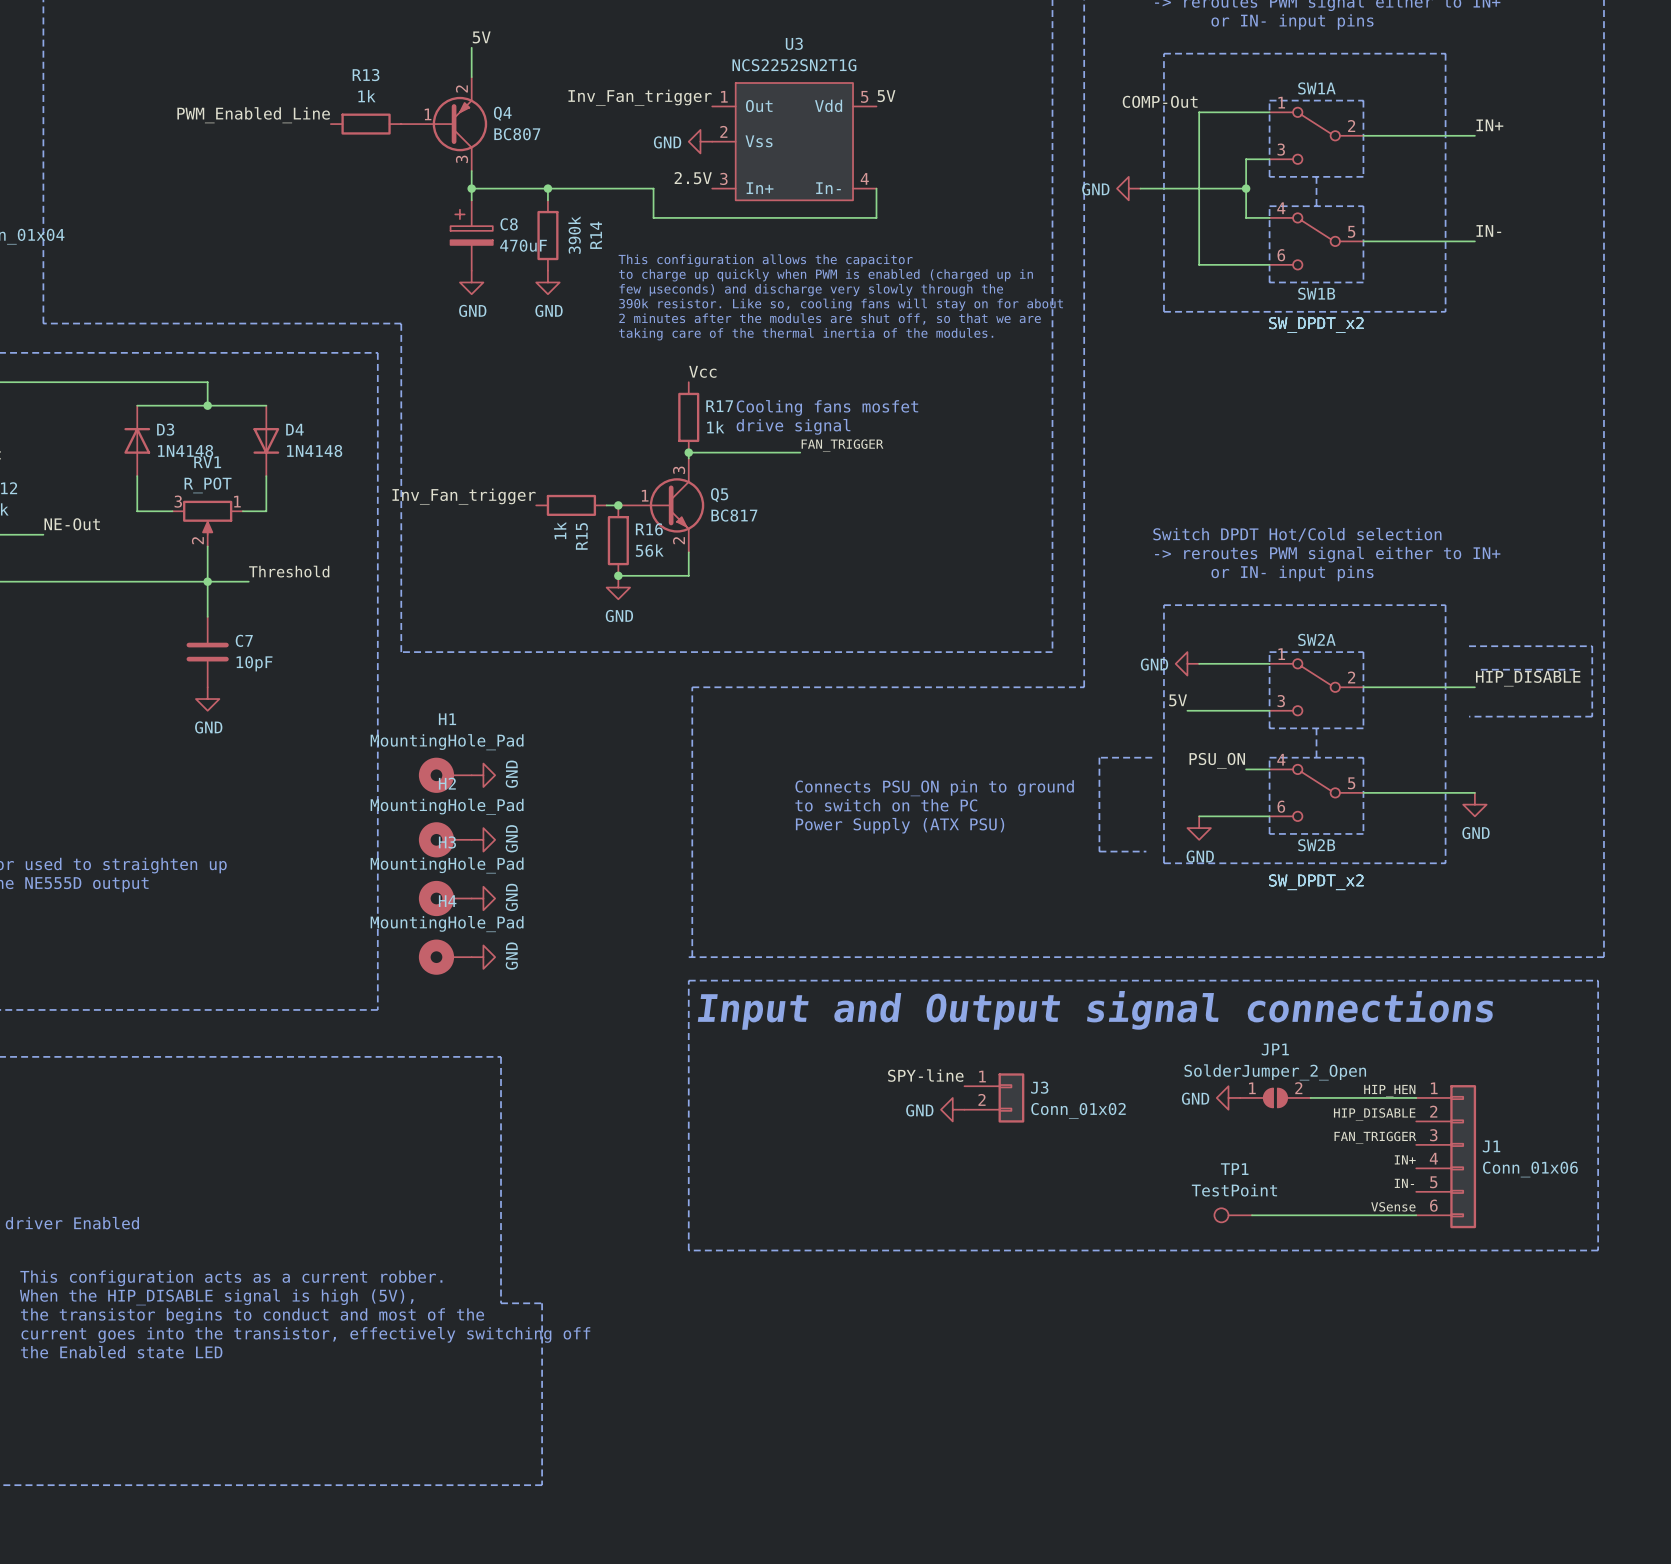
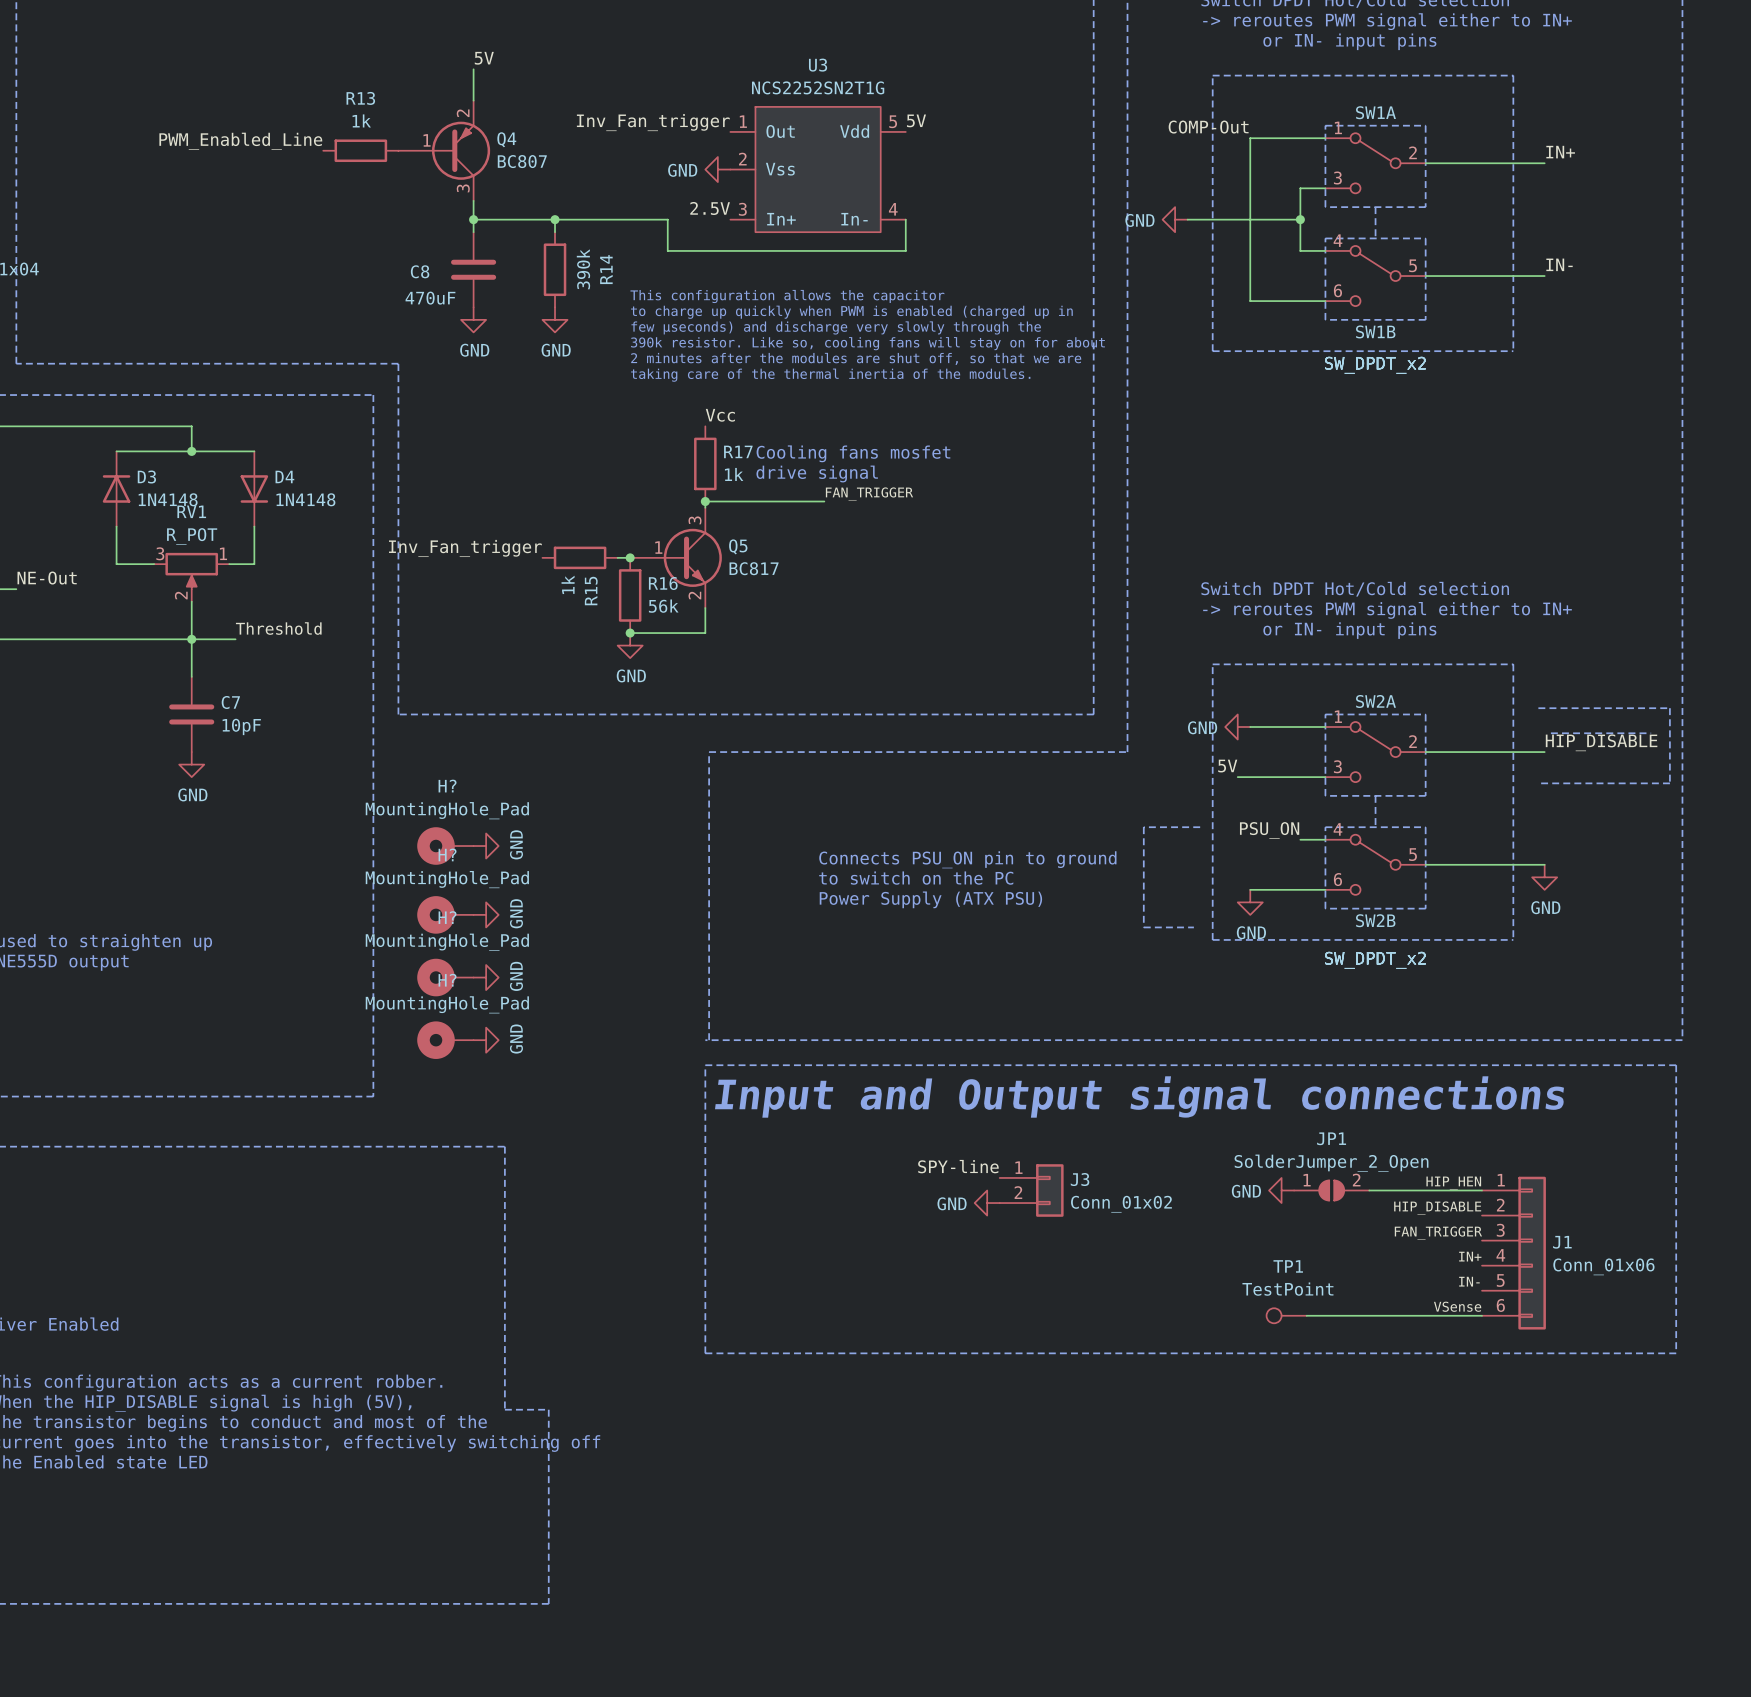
C8 symbol: [450, 200, 493, 271] -> [451, 232, 497, 308]
C8 name position: C8 (509, 224) -> C8 (420, 271)
C8 value position: 470uF (523, 245) -> 470uF (430, 298)
H1 name: H1 (447, 719) -> H? (447, 786)
H2 name: H2 (447, 783) -> H? (447, 854)
H3 name: H3 (447, 842) -> H? (447, 917)
H4 name: H4 (447, 901) -> H? (447, 980)

